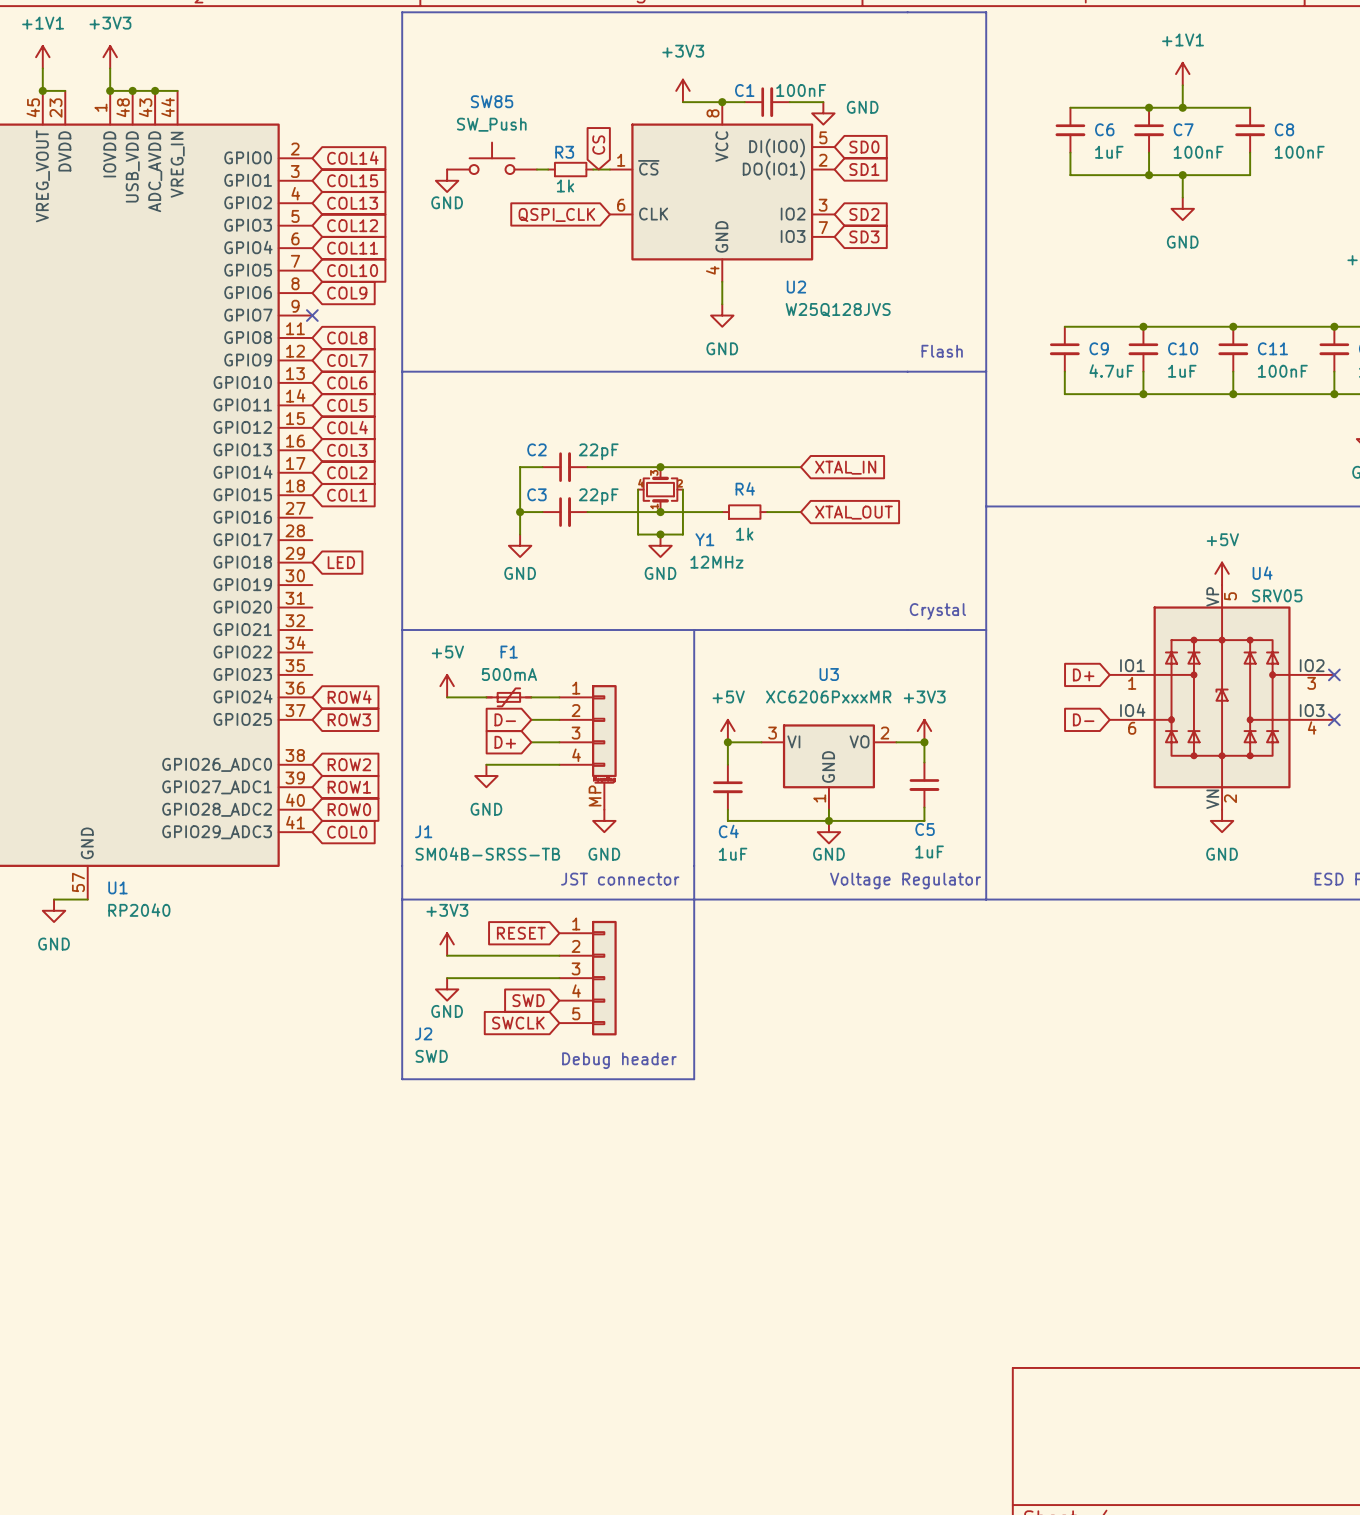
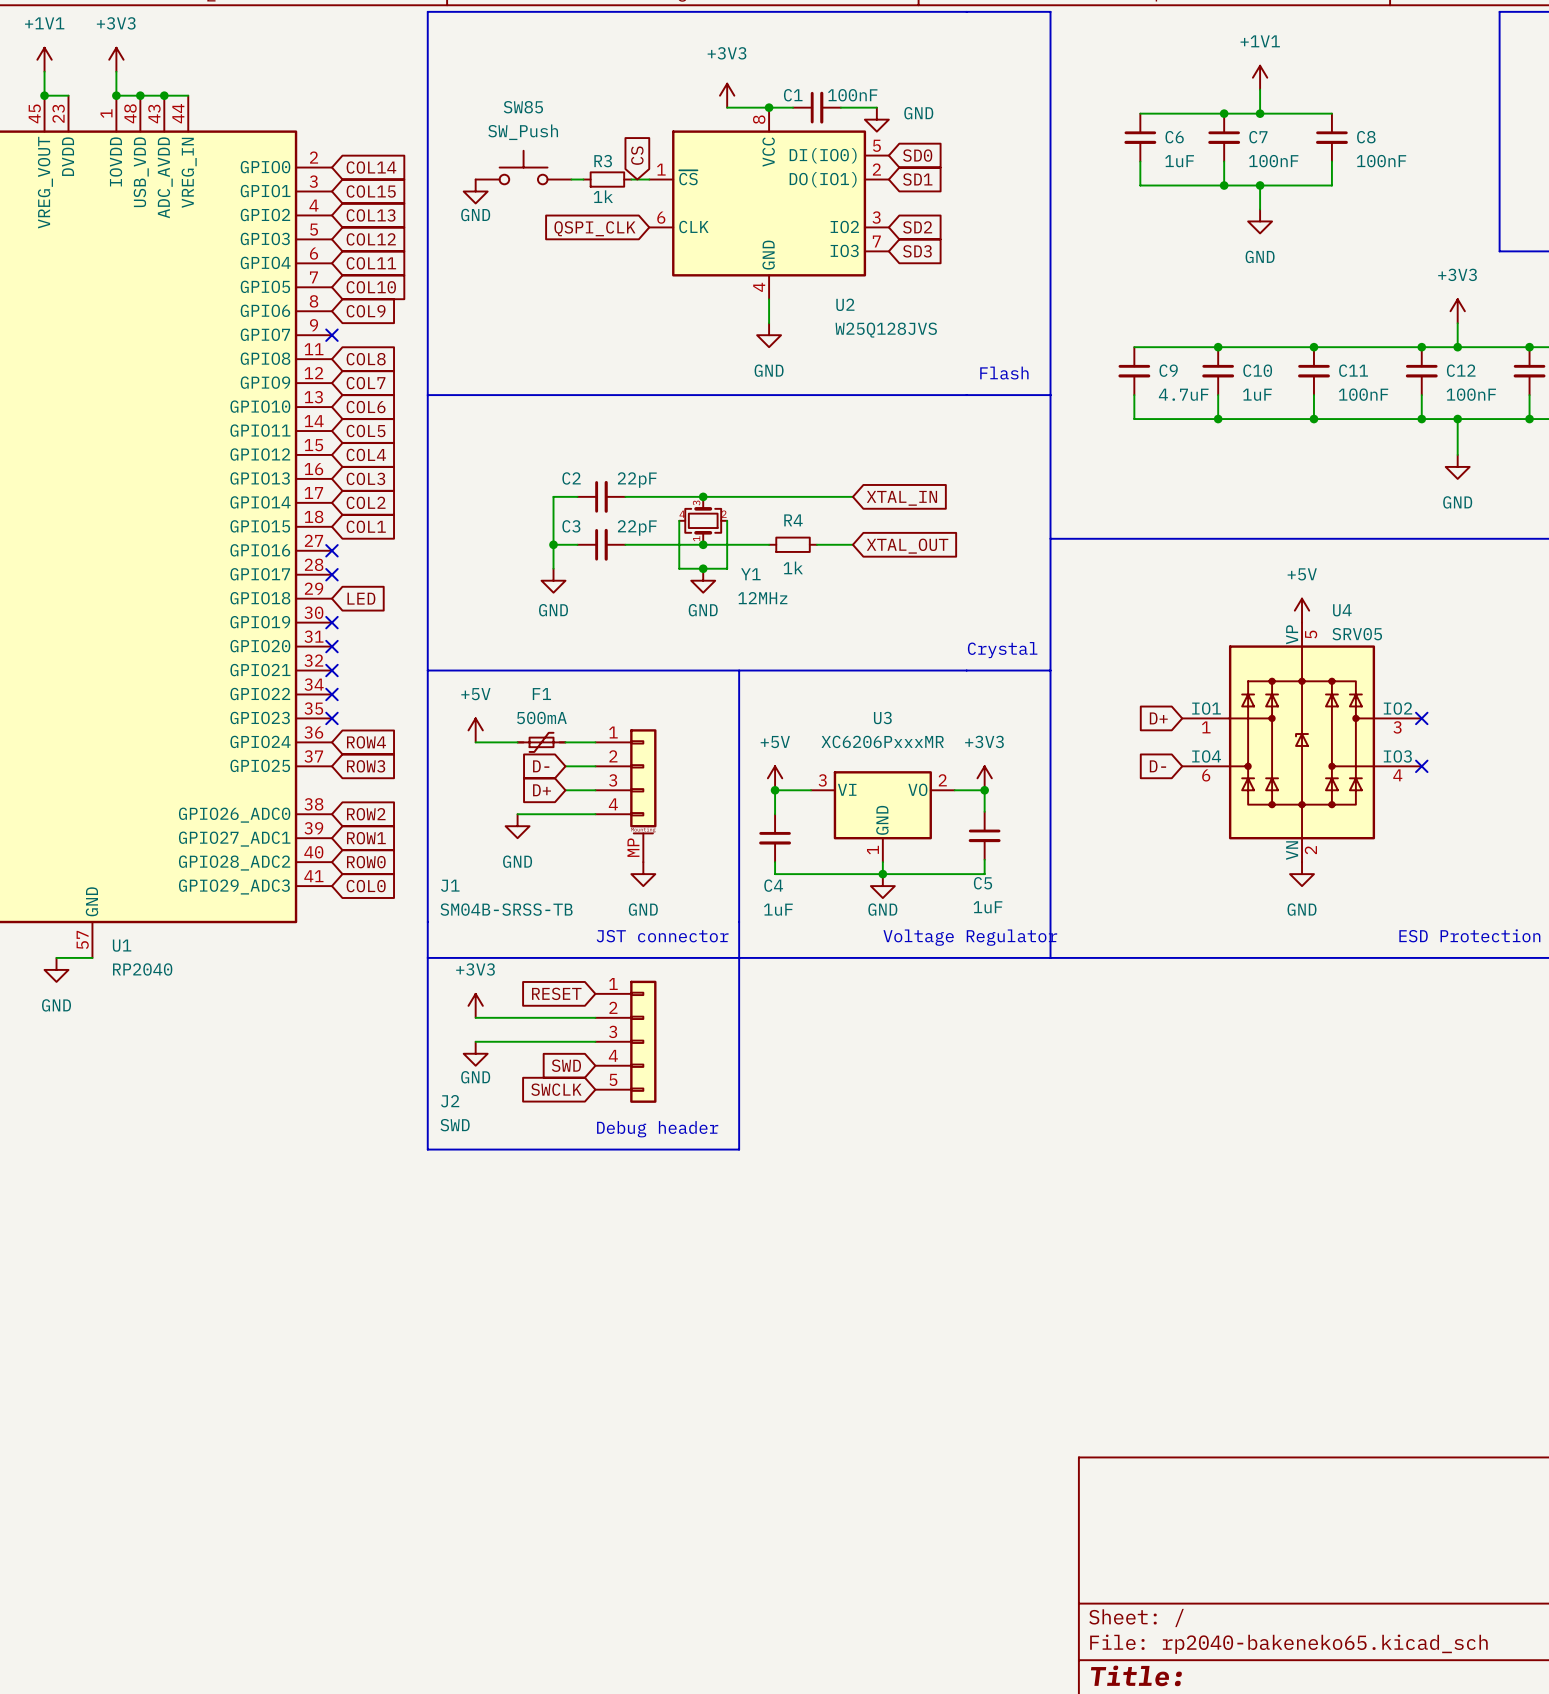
no-connect mark: none -> (331, 550)
no-connect mark: none -> (331, 574)
no-connect mark: none -> (331, 622)
no-connect mark: none -> (331, 646)
no-connect mark: none -> (331, 670)
no-connect mark: none -> (331, 694)
no-connect mark: none -> (331, 718)

